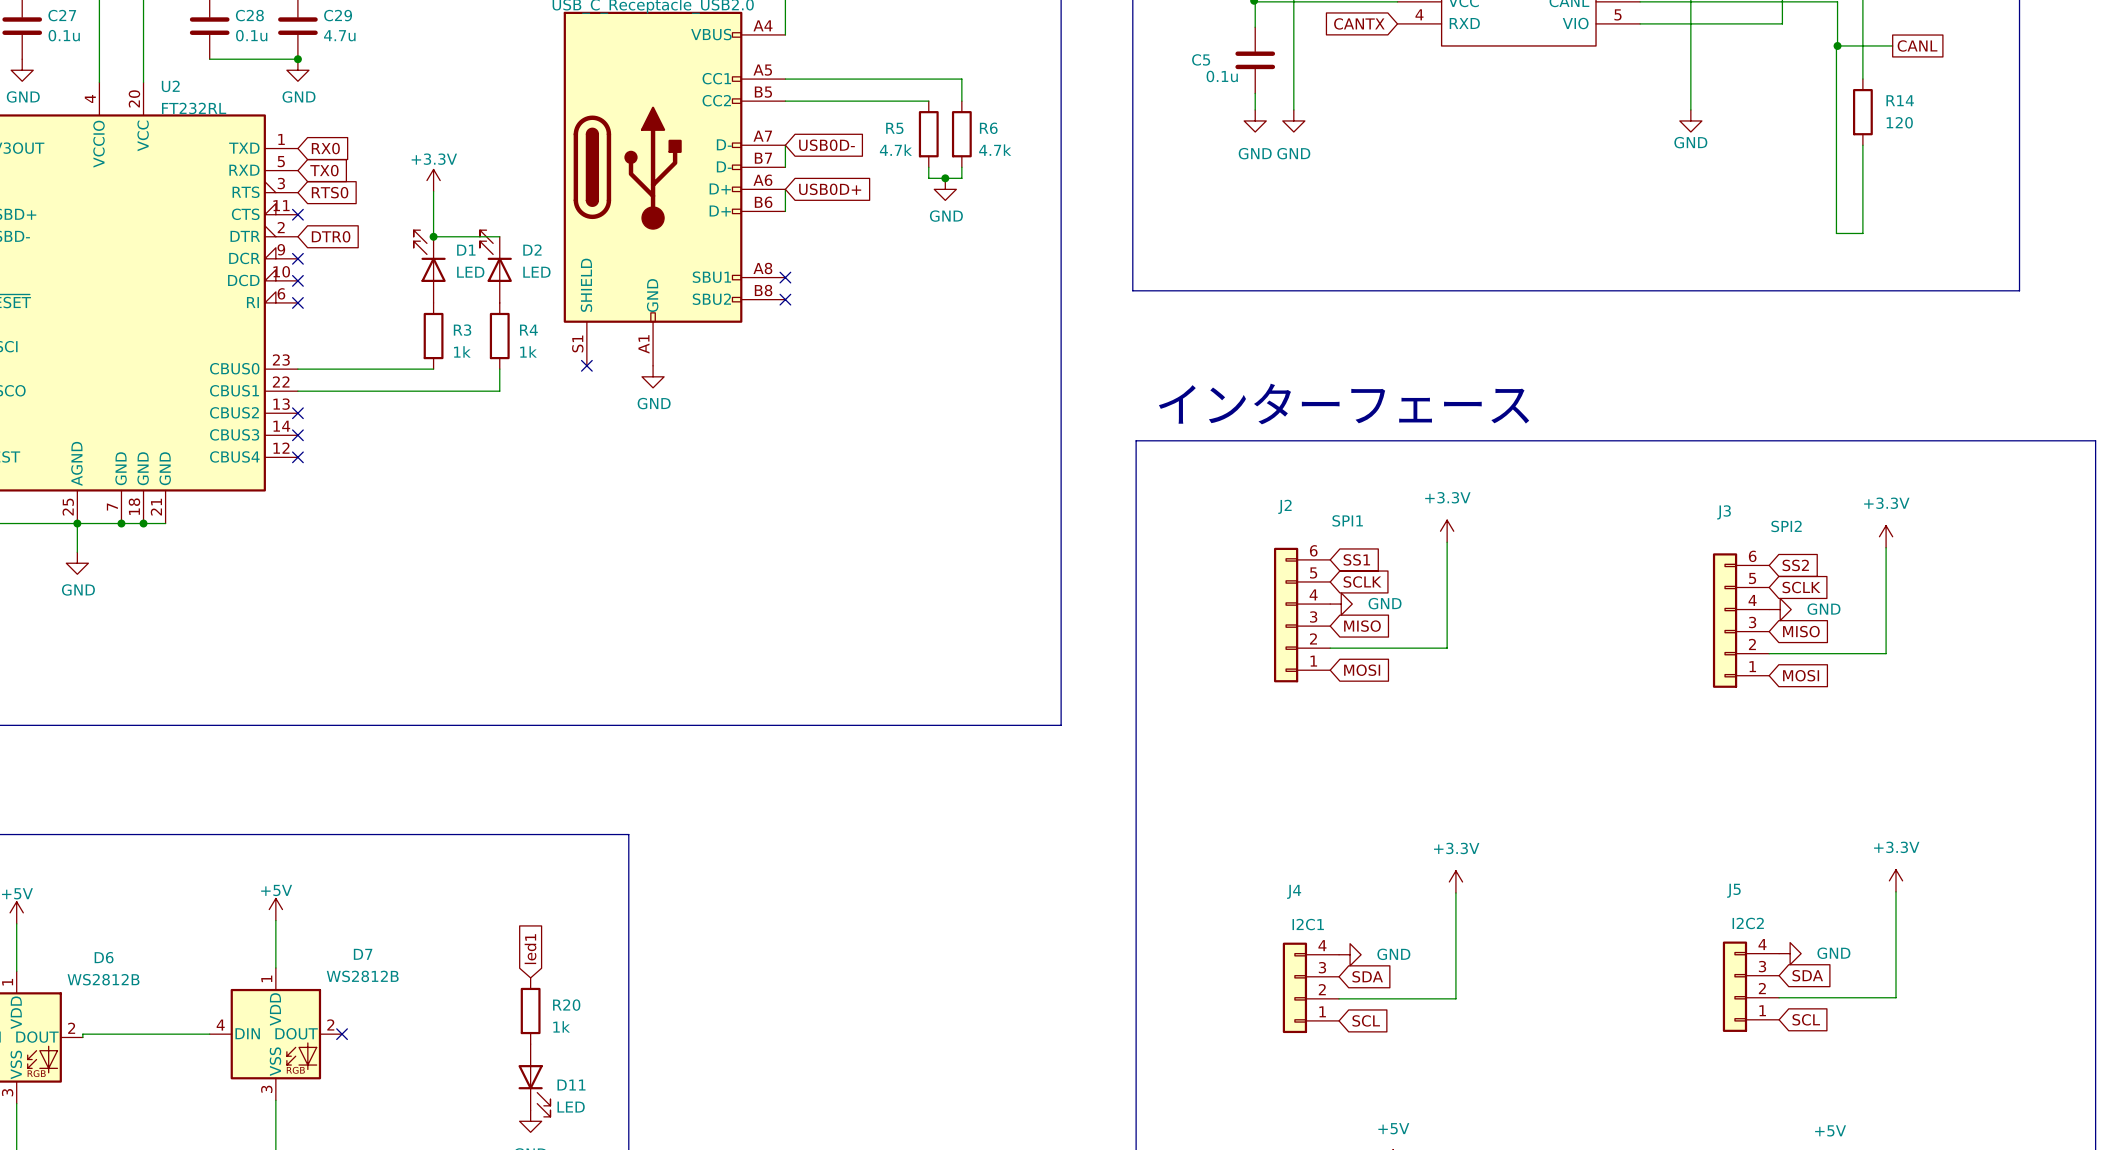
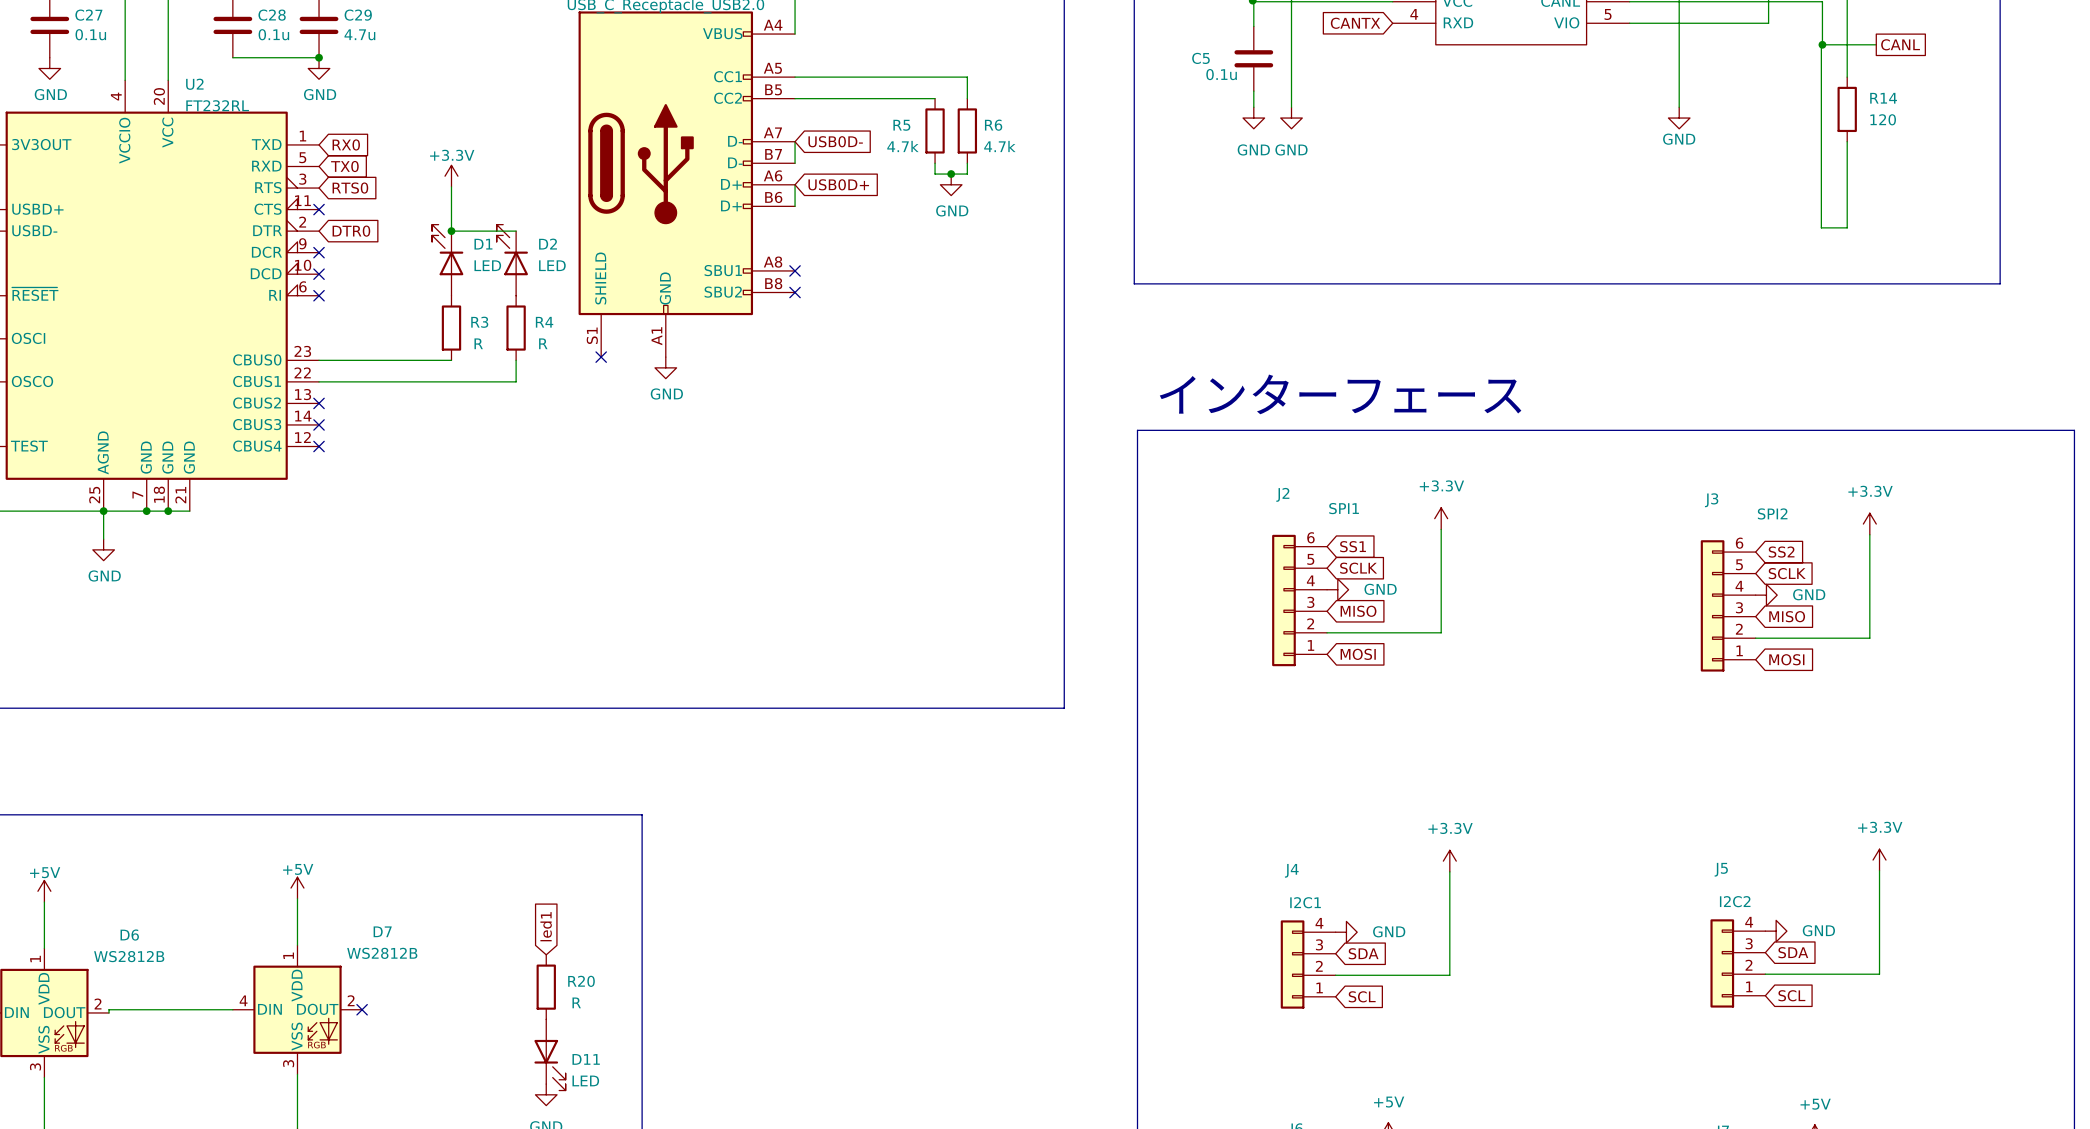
R3 value: 1k (462, 351) -> R (478, 343)
R4 value: 1k (528, 351) -> R (543, 343)
R20 value: 1k (561, 1026) -> R (576, 1002)

